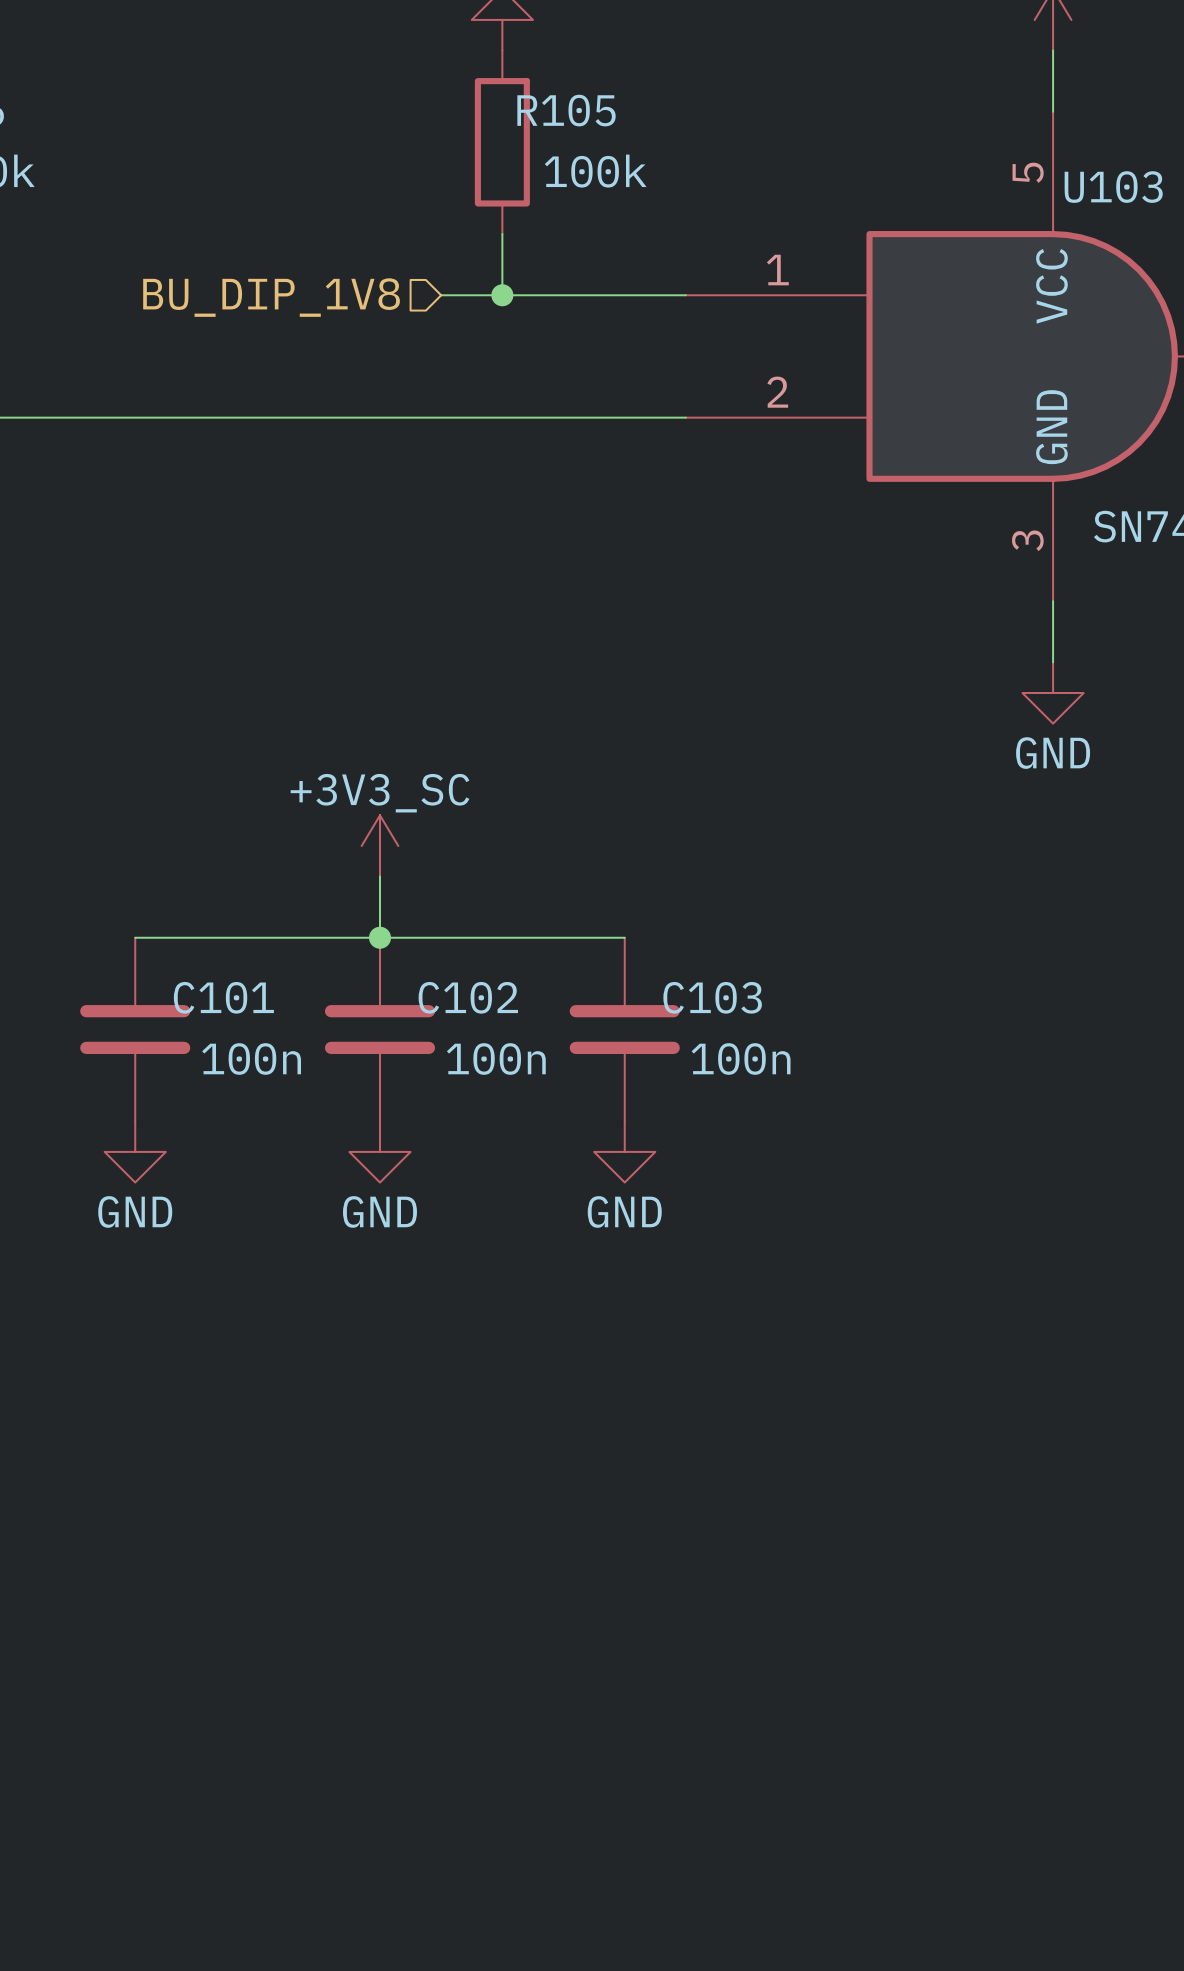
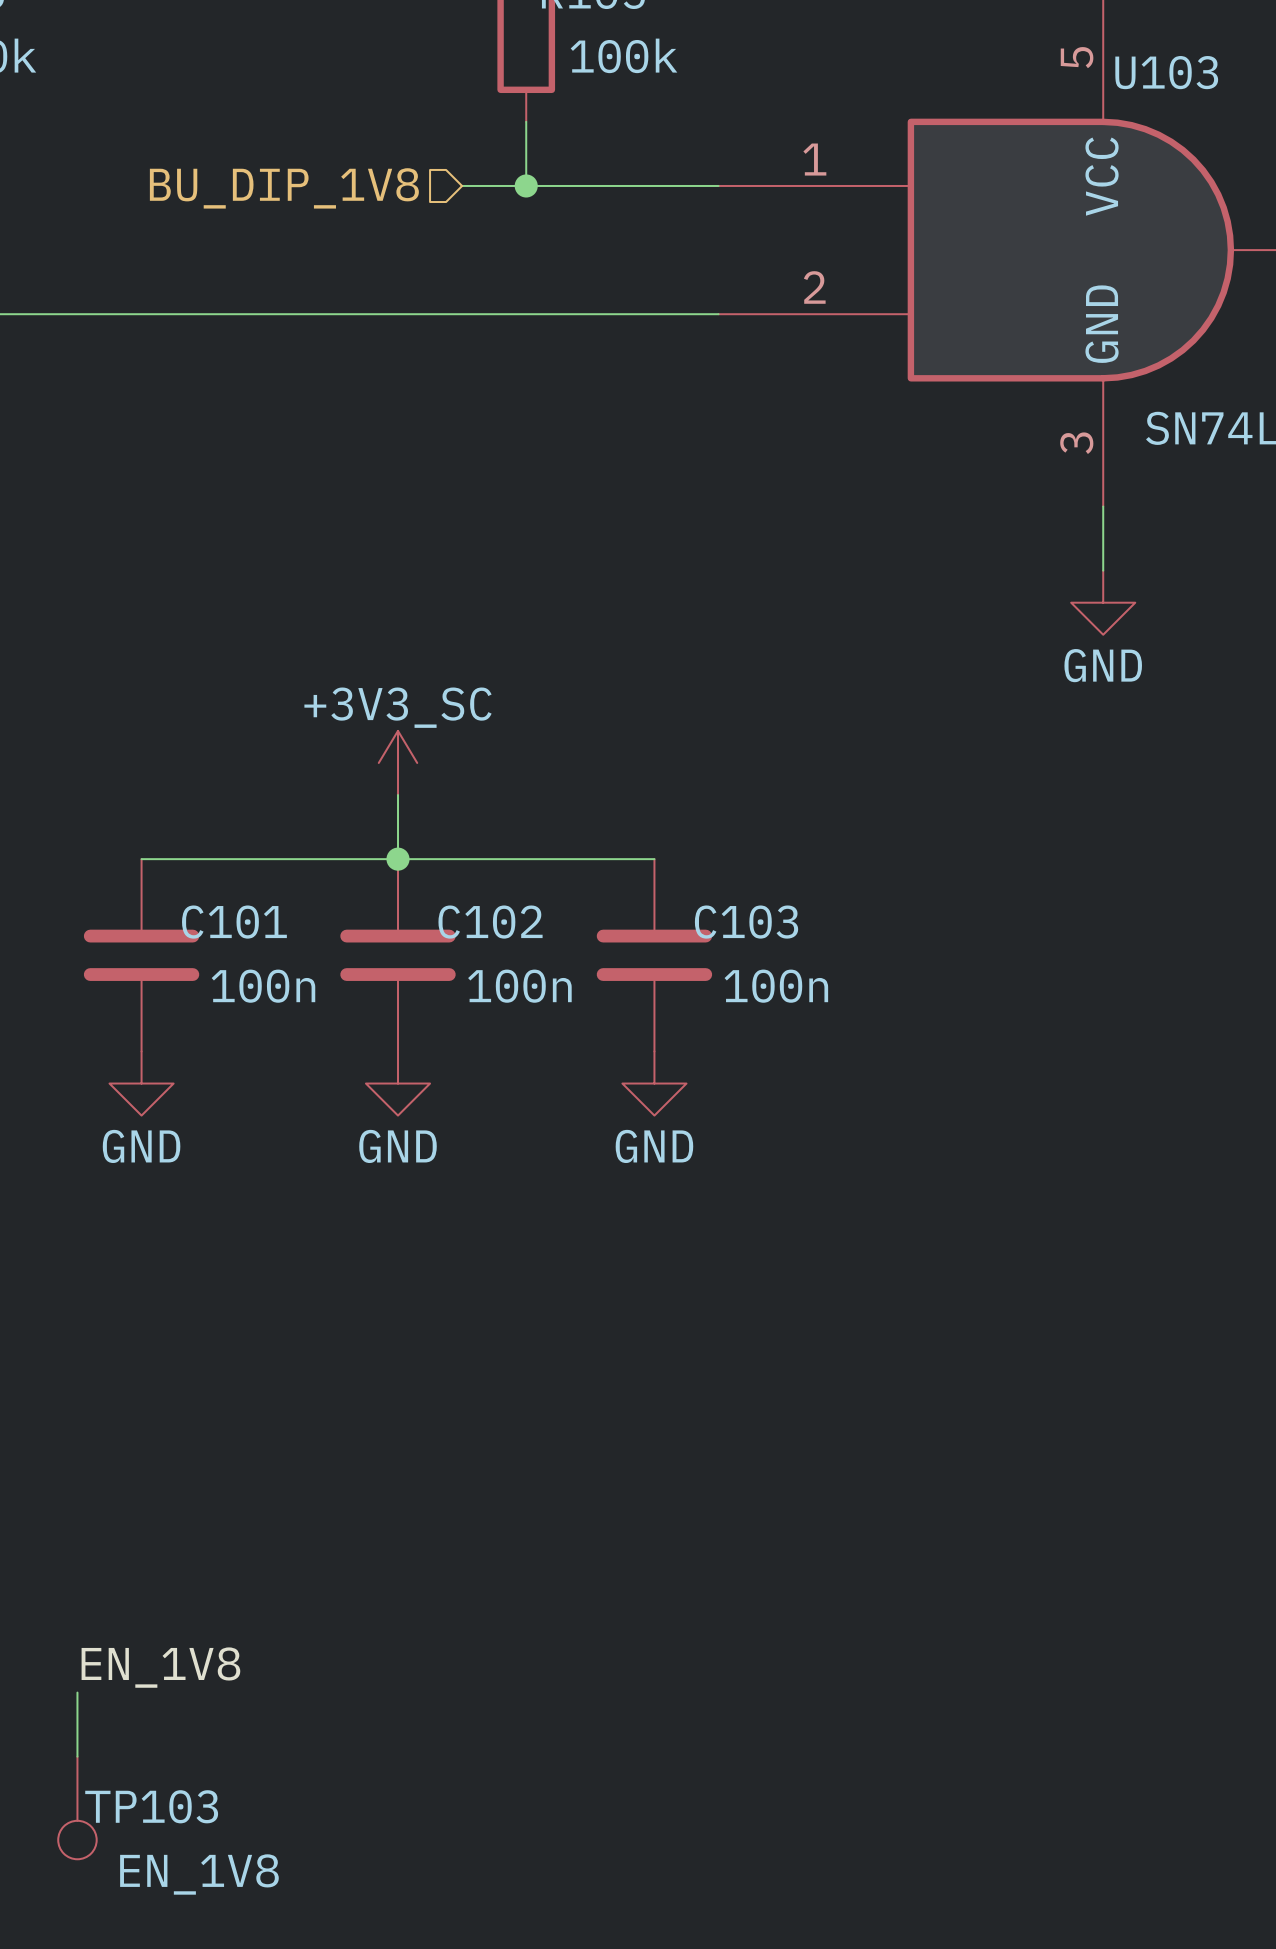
label: none -> EN_1V8 (160, 1667)
wire: none -> (77, 1692) (77, 1756)
TP103: none -> EN_1V8 (77, 1807)

